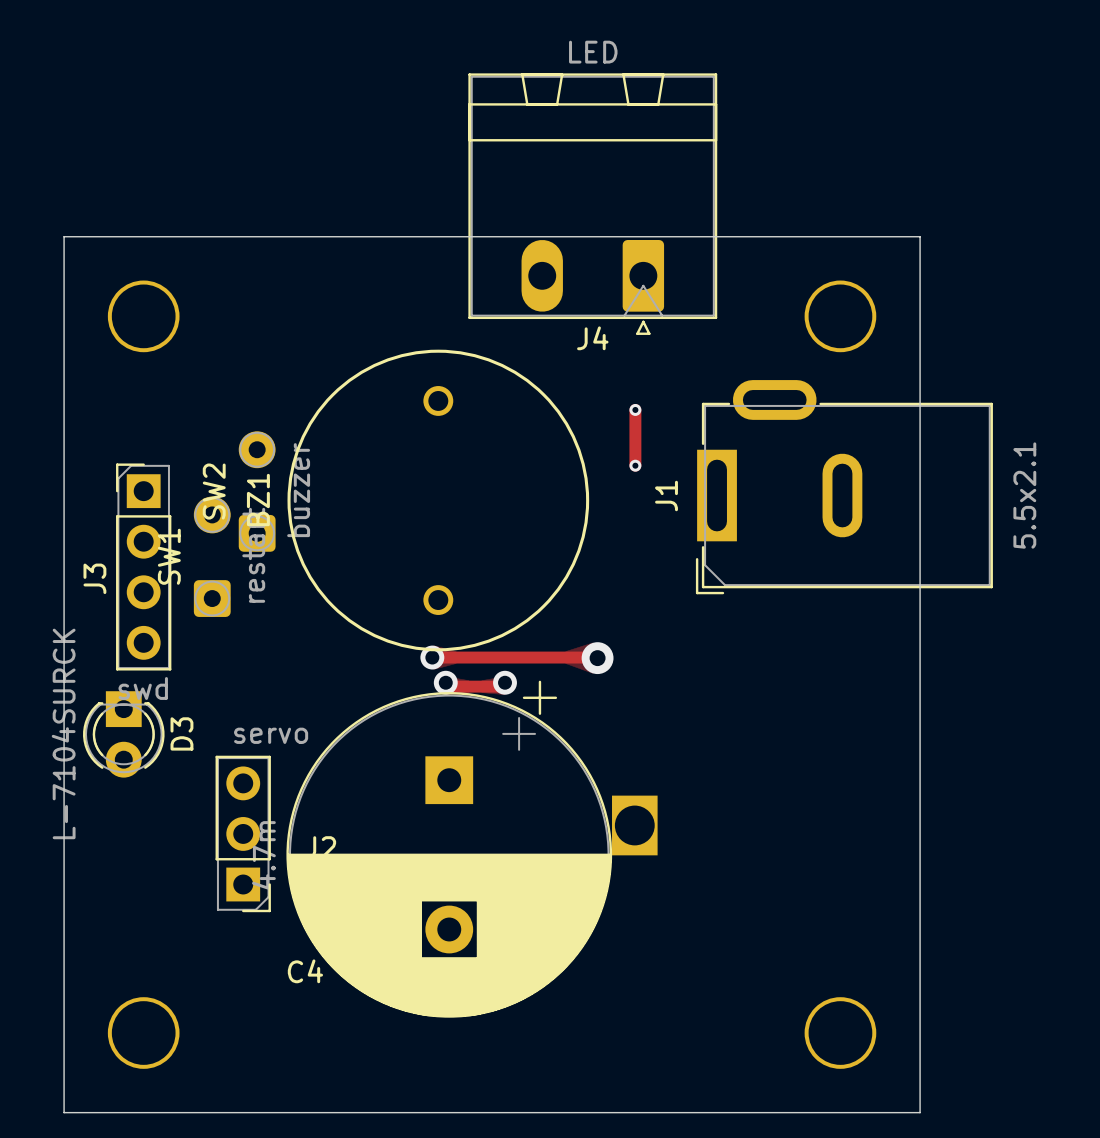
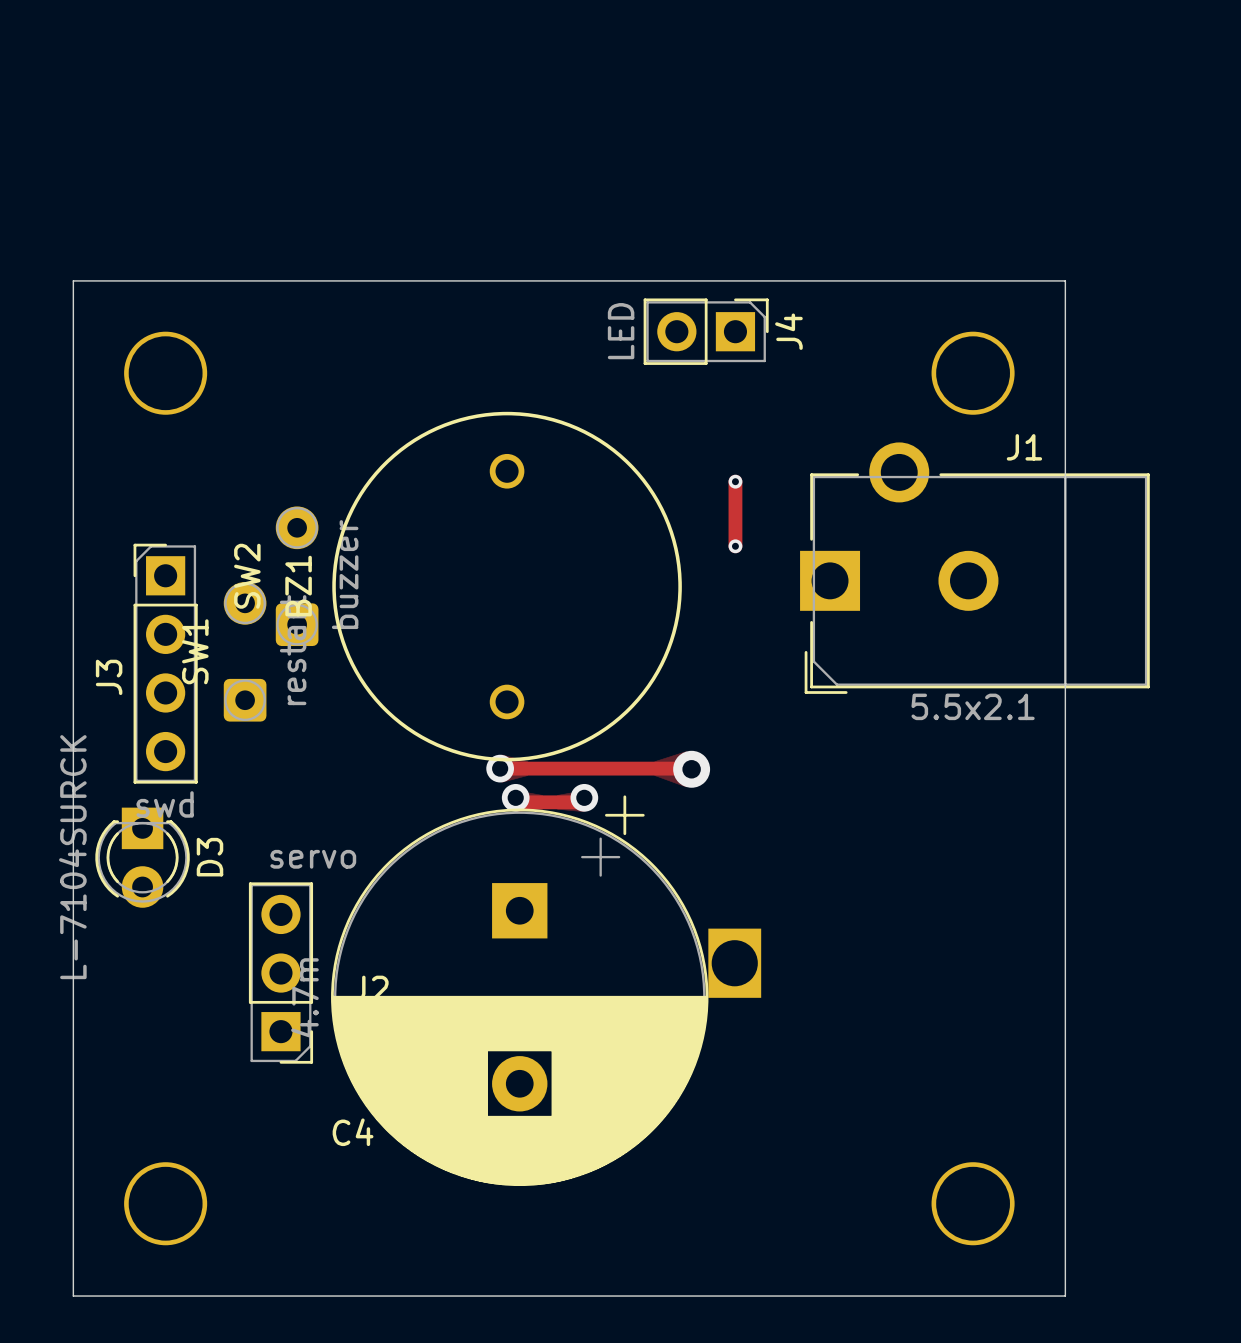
J4 value position: LED (593, 52) -> LED (621, 331)
J4 footprint: [468, 73, 718, 335] -> [643, 298, 769, 365]
J4 name position: J4 (592, 338) -> J4 (788, 331)
J1 footprint: [695, 380, 993, 595] -> [800, 442, 1150, 694]
J1 value position: 5.5x2.1 (1024, 495) -> 5.5x2.1 (973, 706)
J1 name position: J1 (666, 496) -> J1 (1024, 447)

